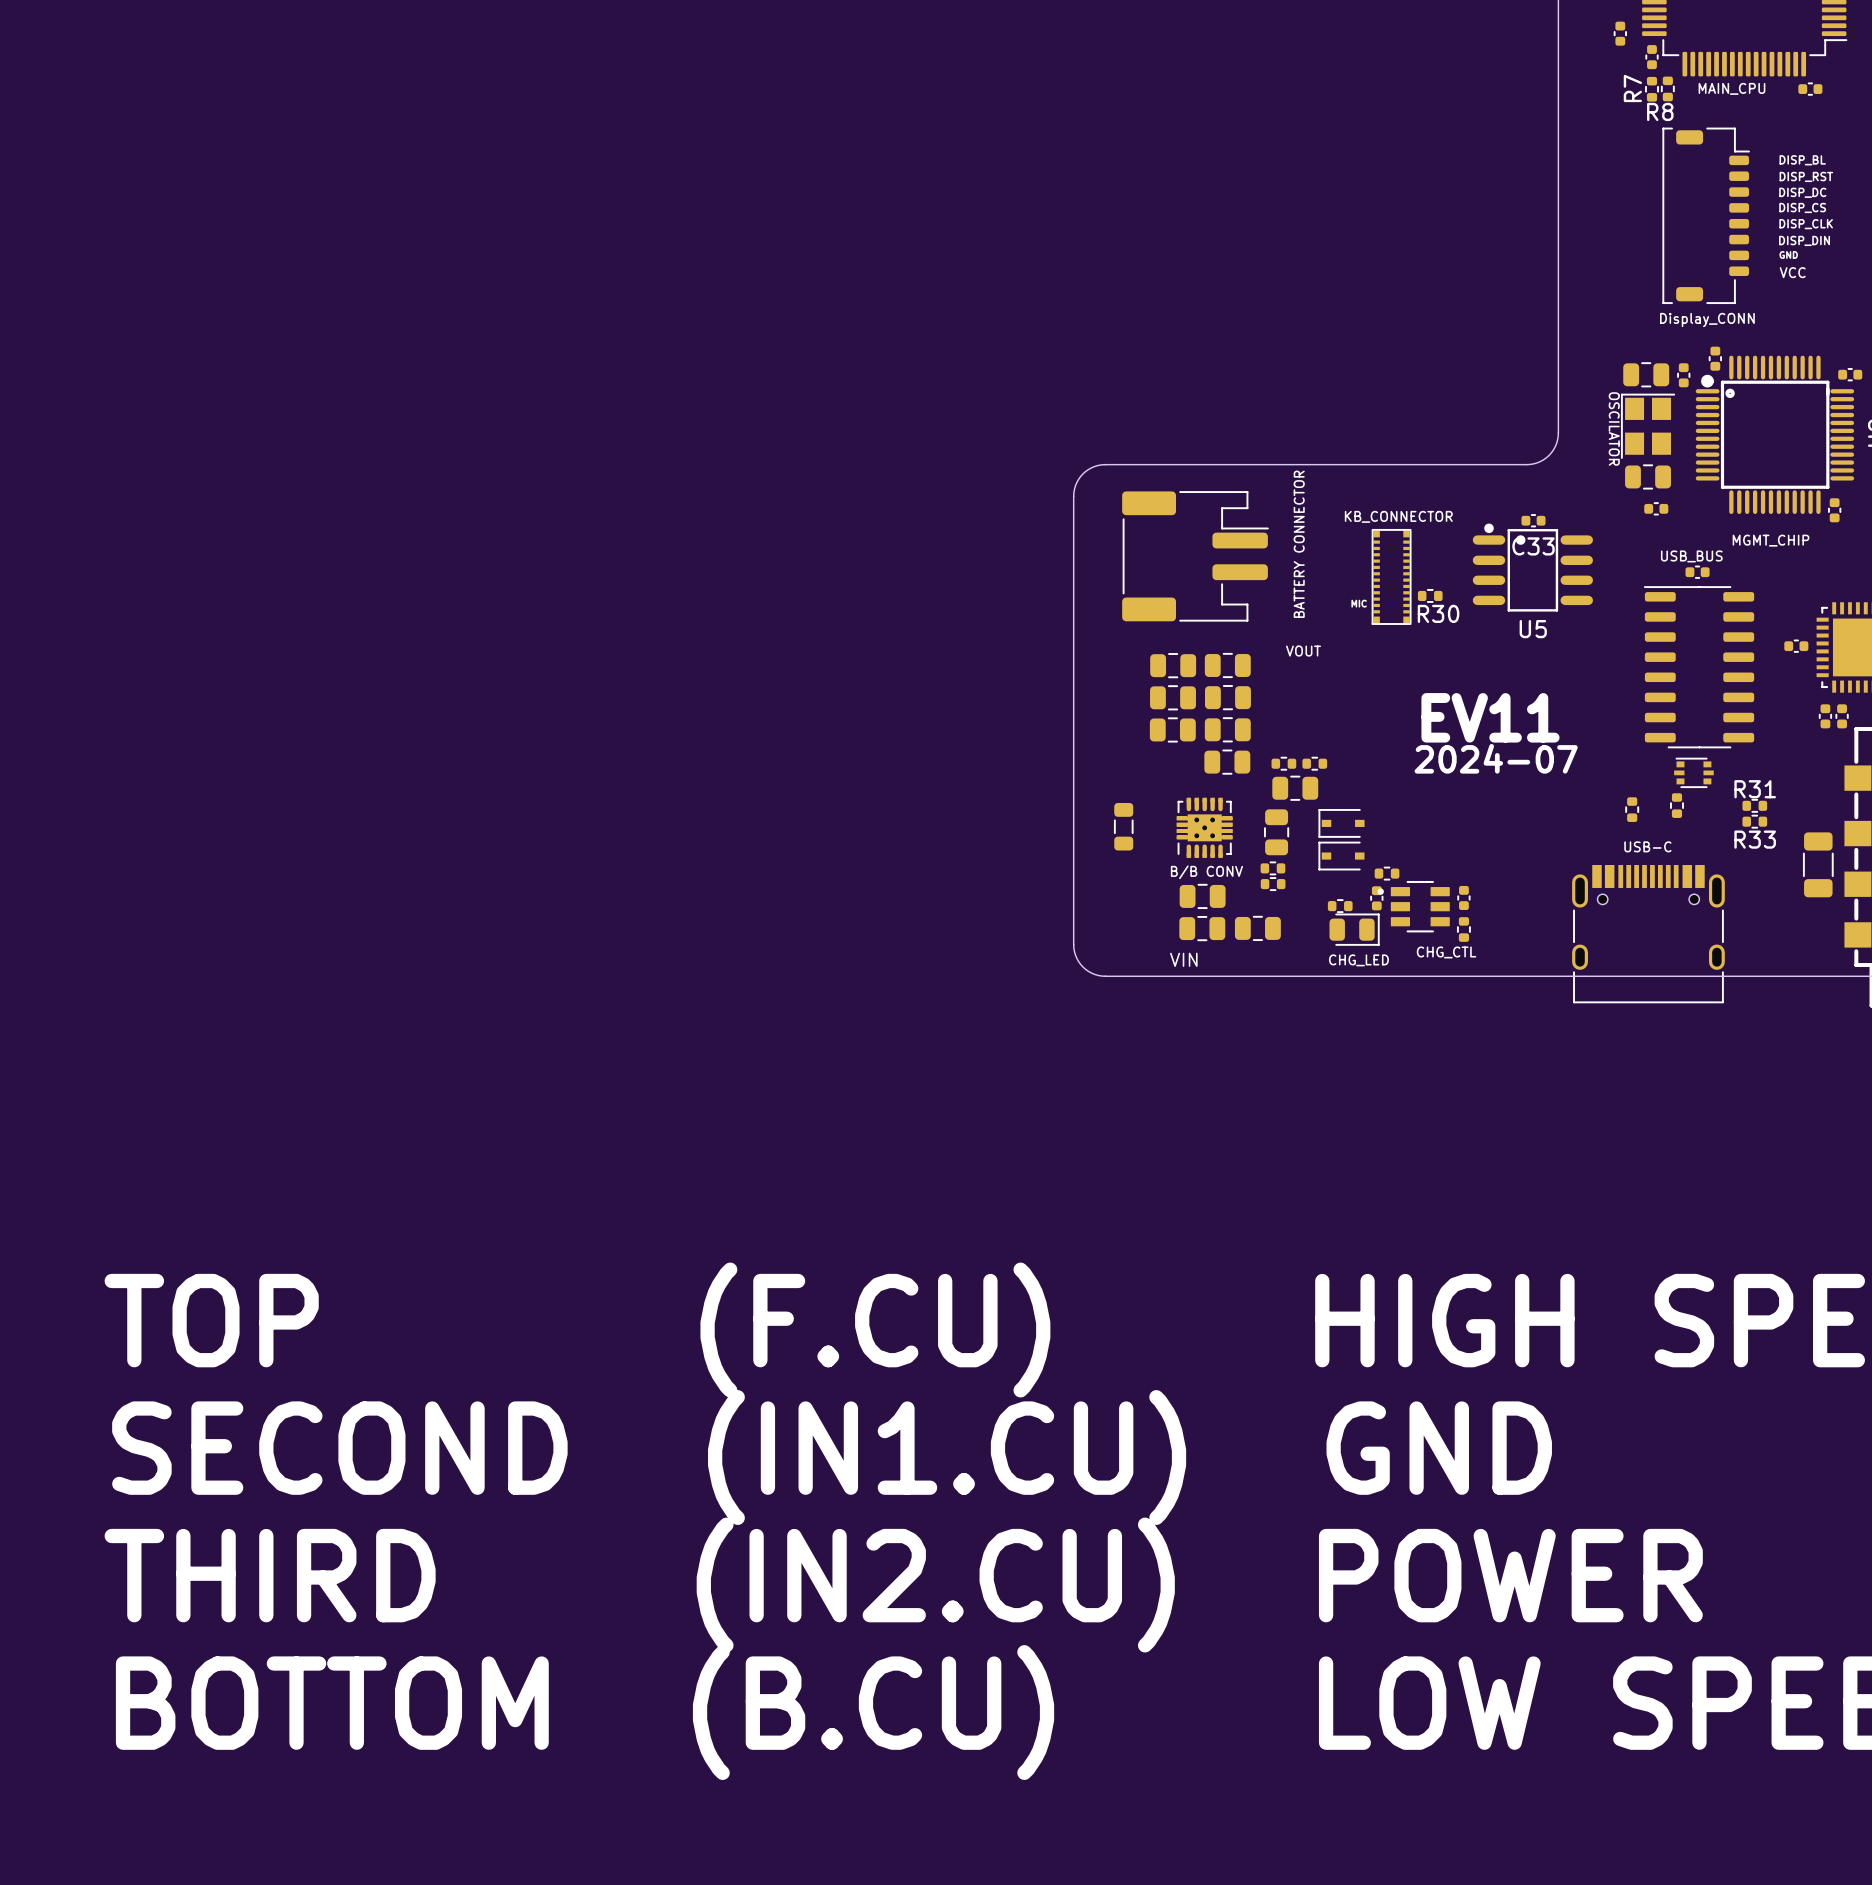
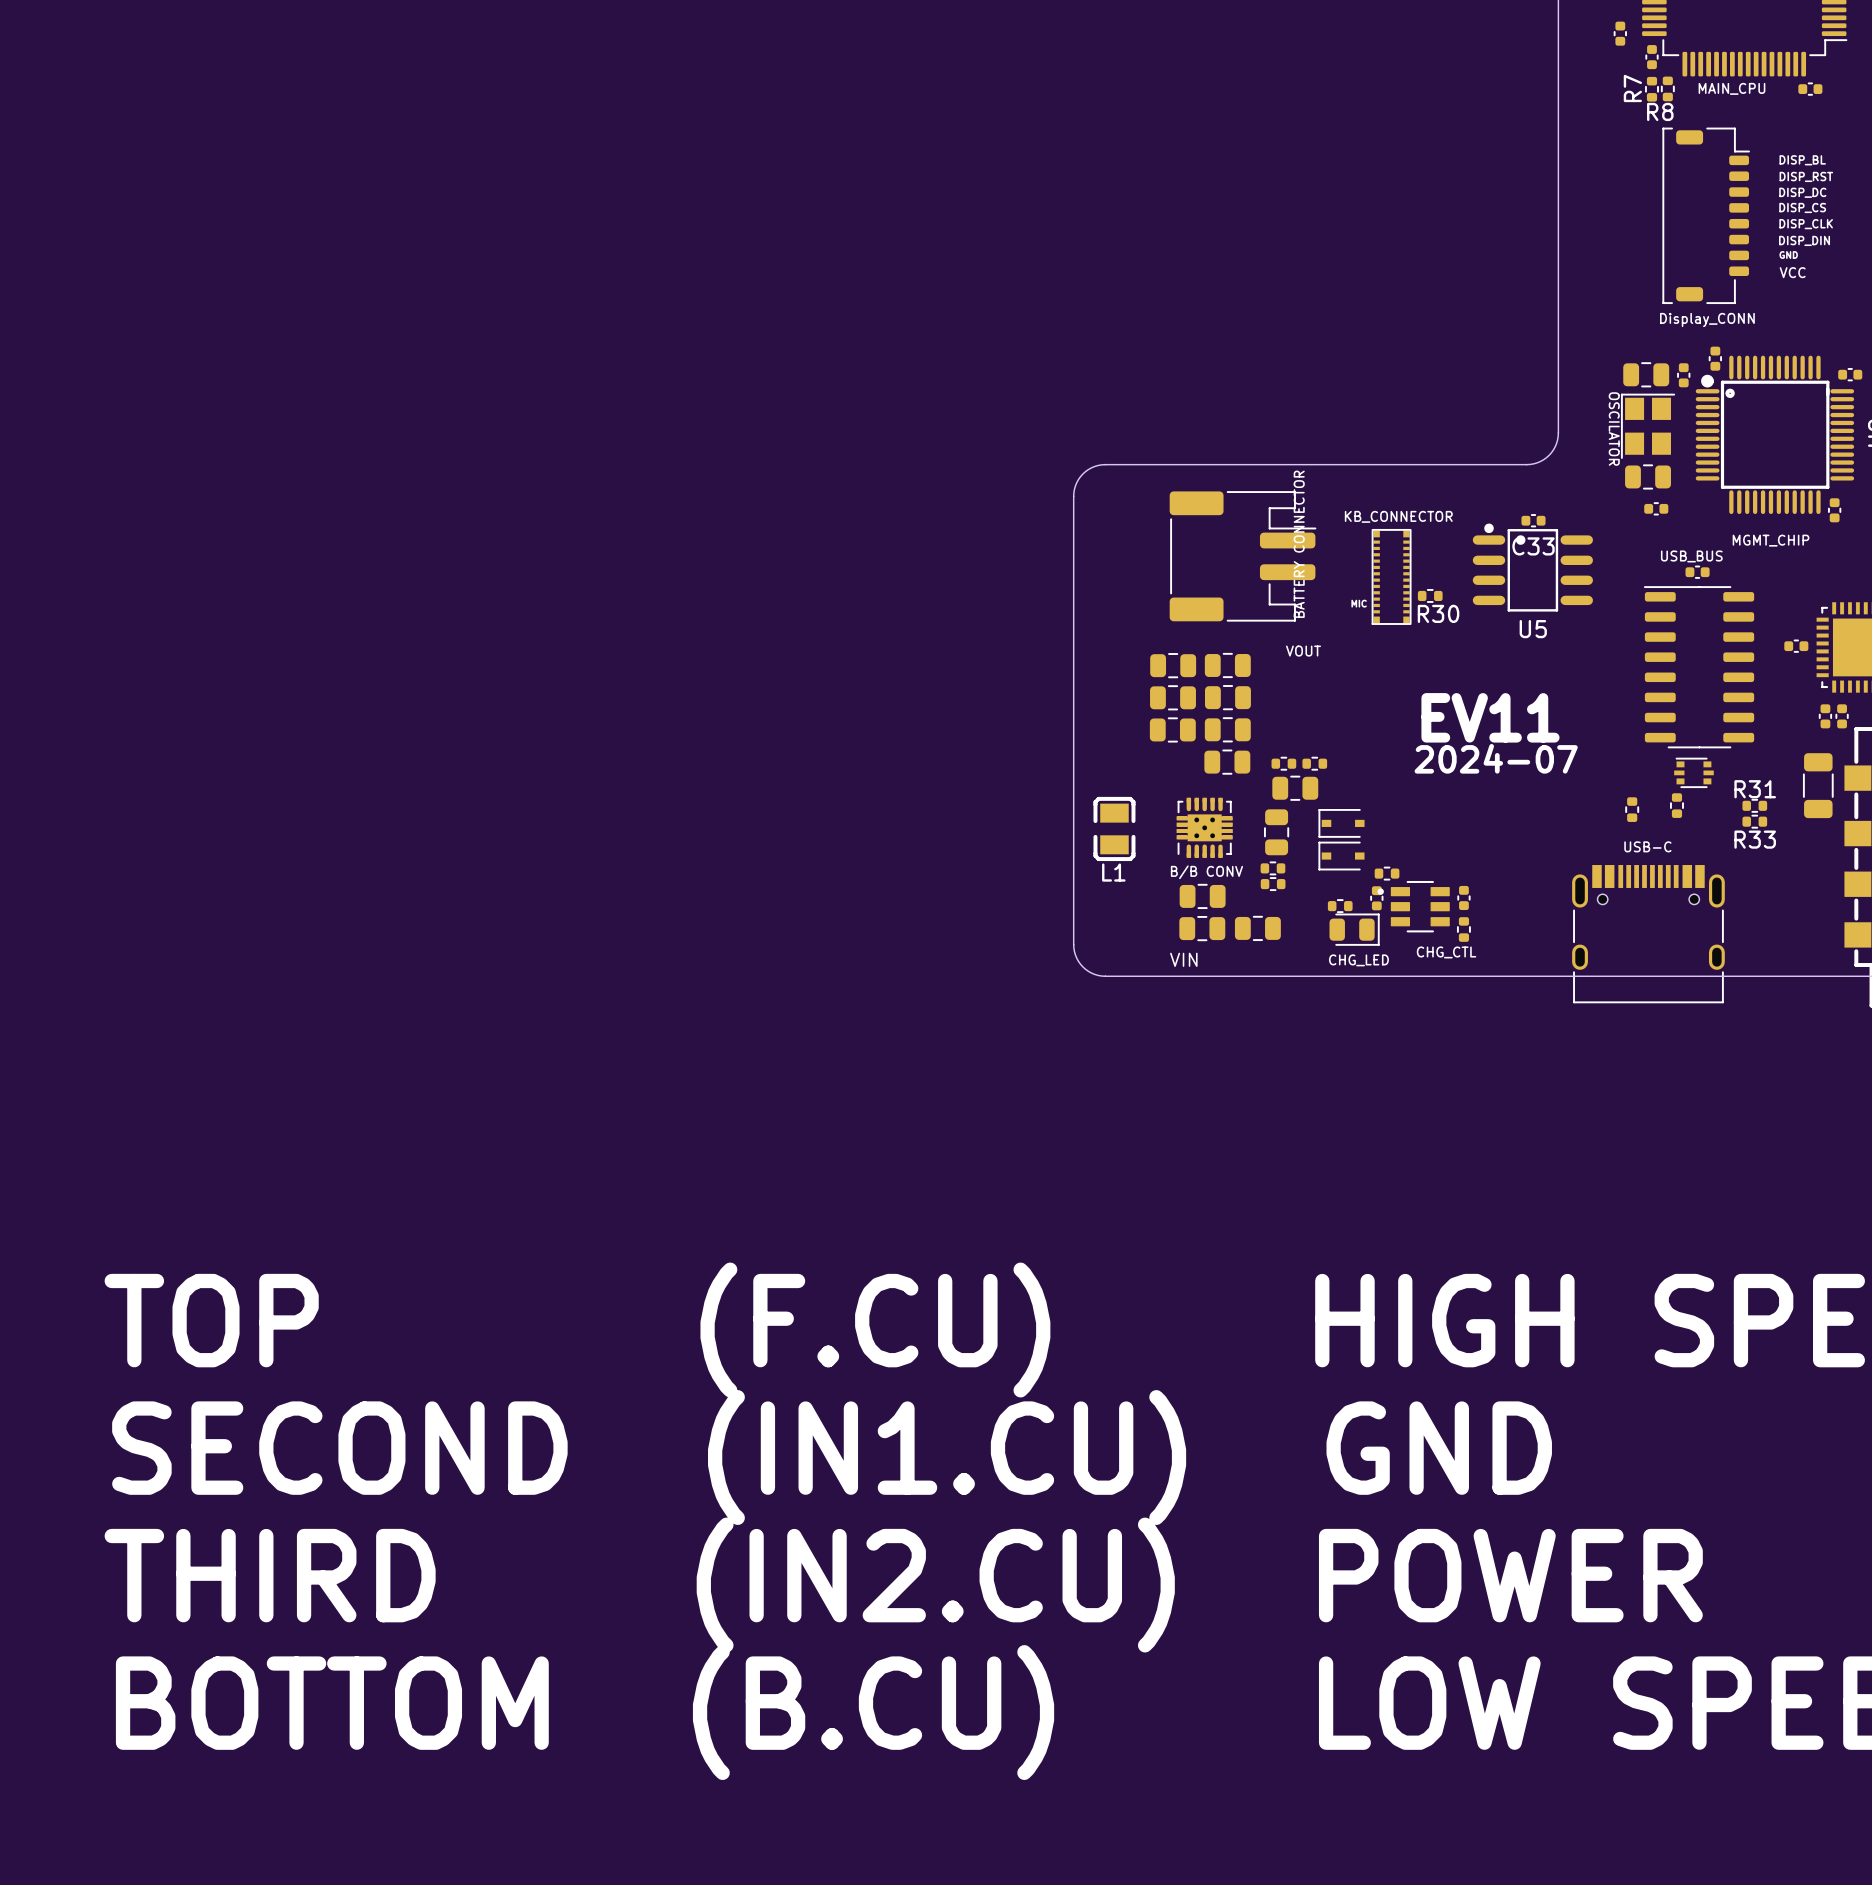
part position: (1195, 556) -> (1243, 556)
part: (1123, 826) -> none
L1: none -> (1114, 828)
part position: (1818, 864) -> (1818, 785)

